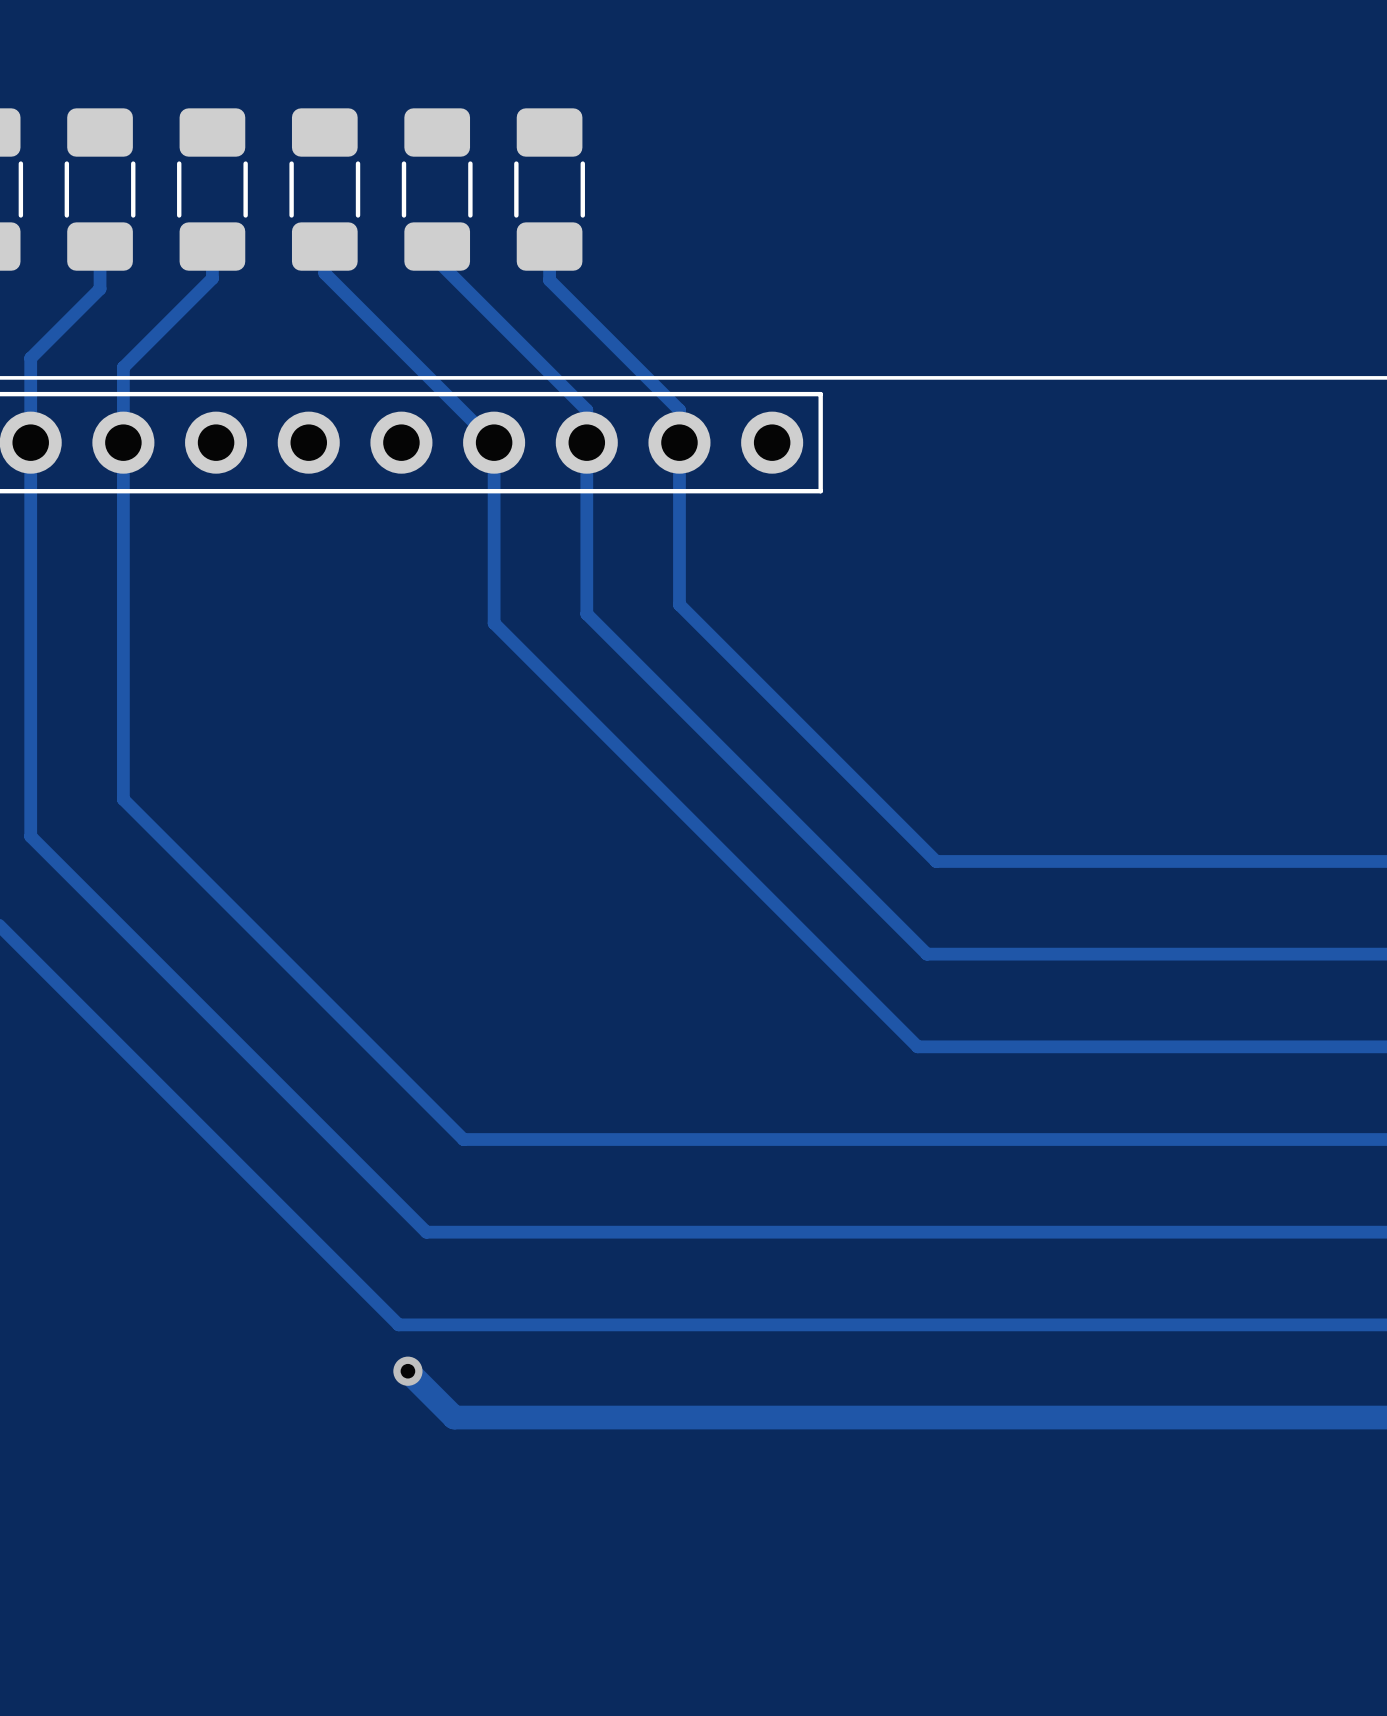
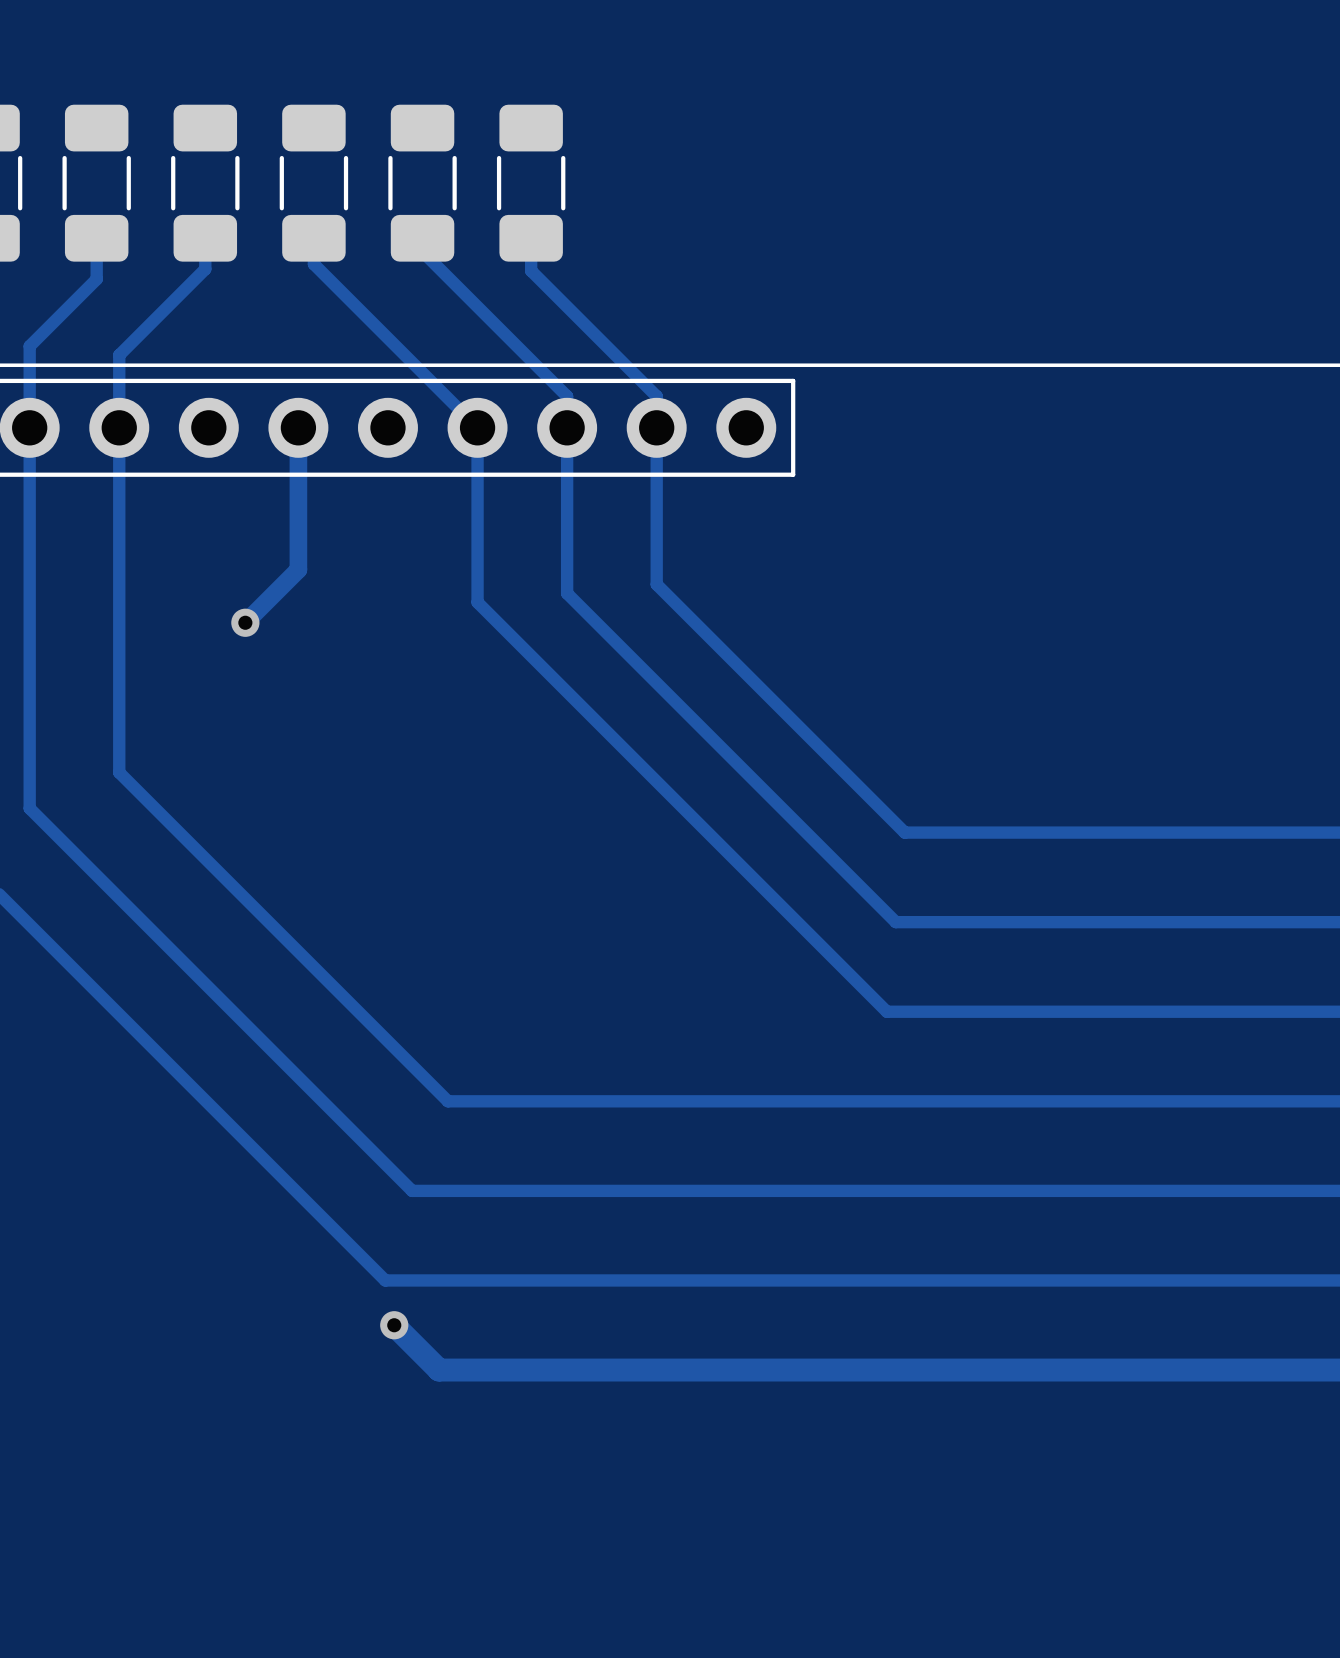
track: none -> (298, 427) (298, 569) (245, 622)
via: none -> (245, 622)

